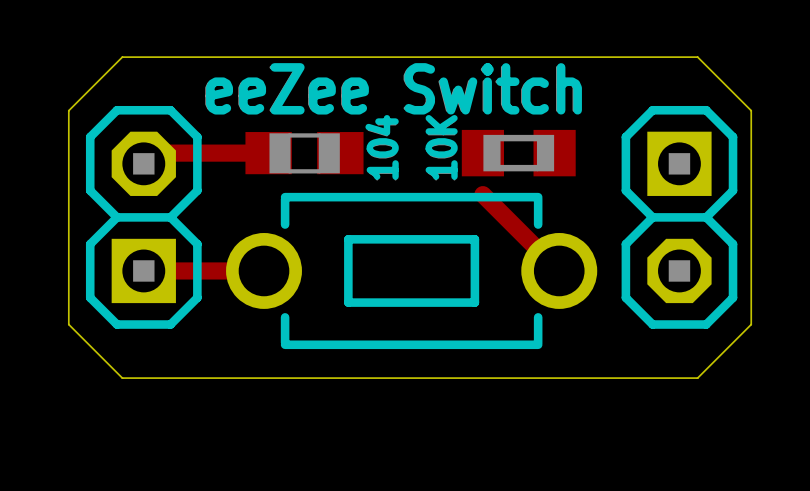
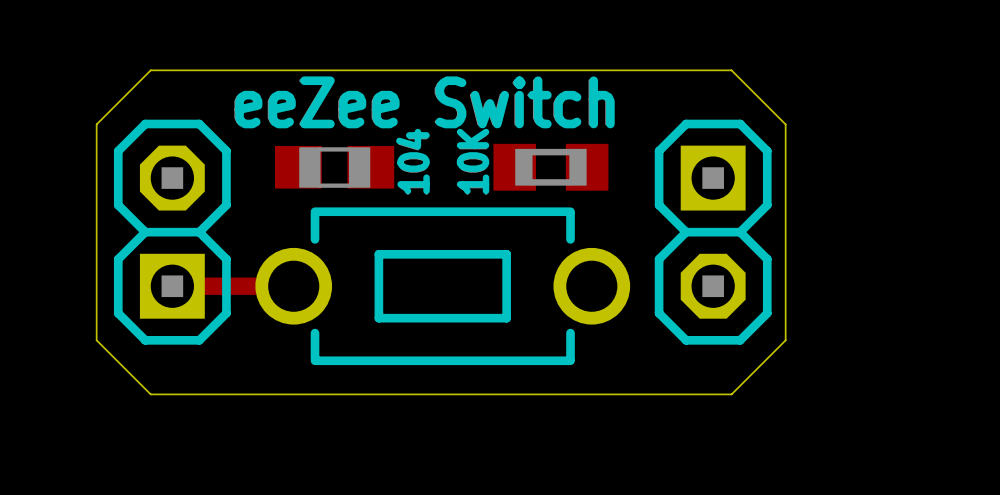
track: (268, 153) (154, 153) (143, 163) -> none
track: (482, 194) (559, 270) -> none

